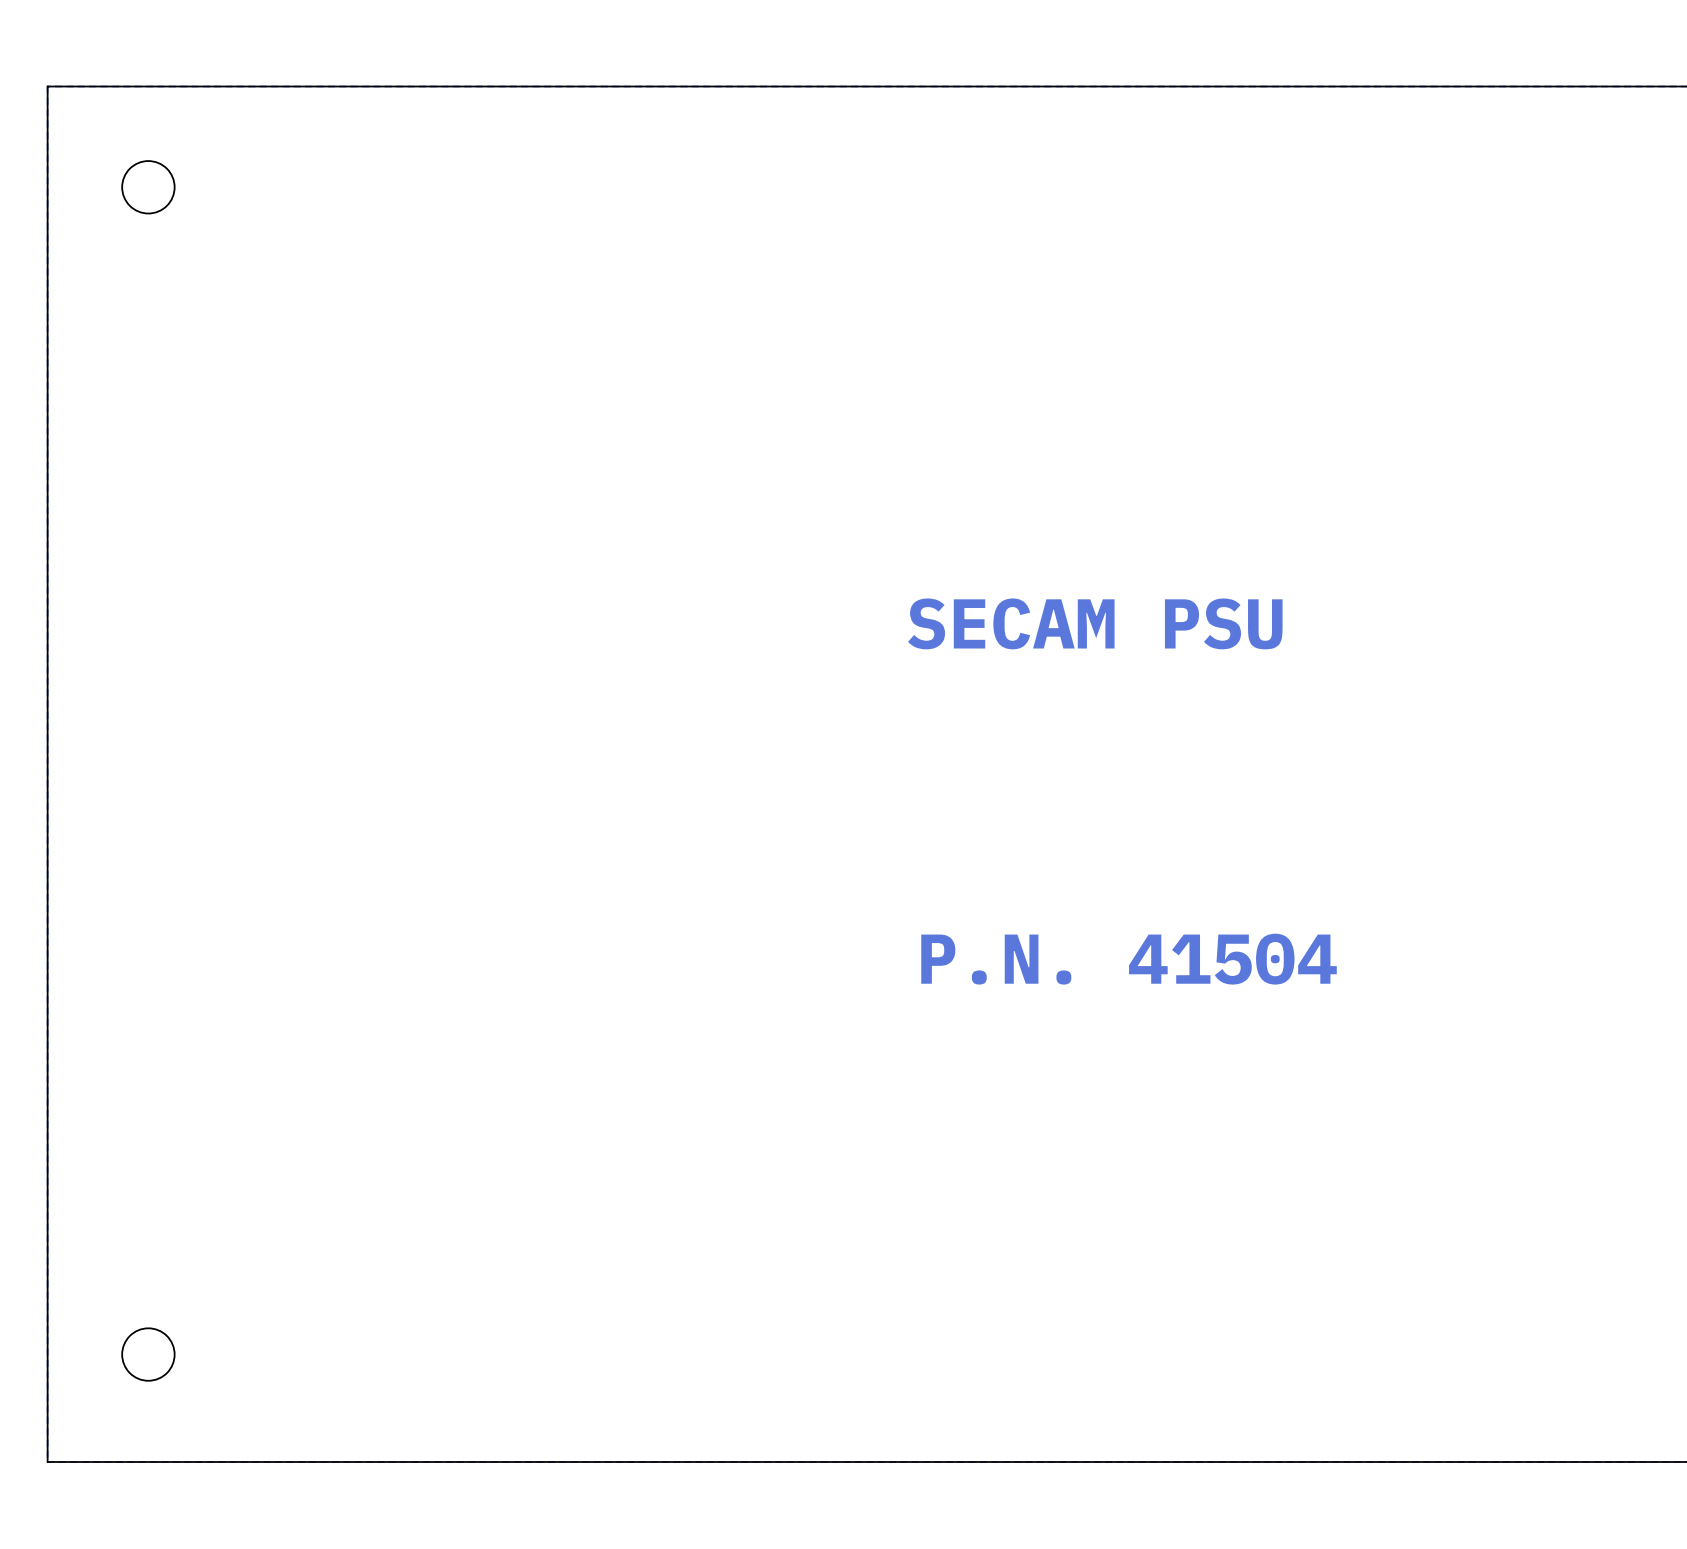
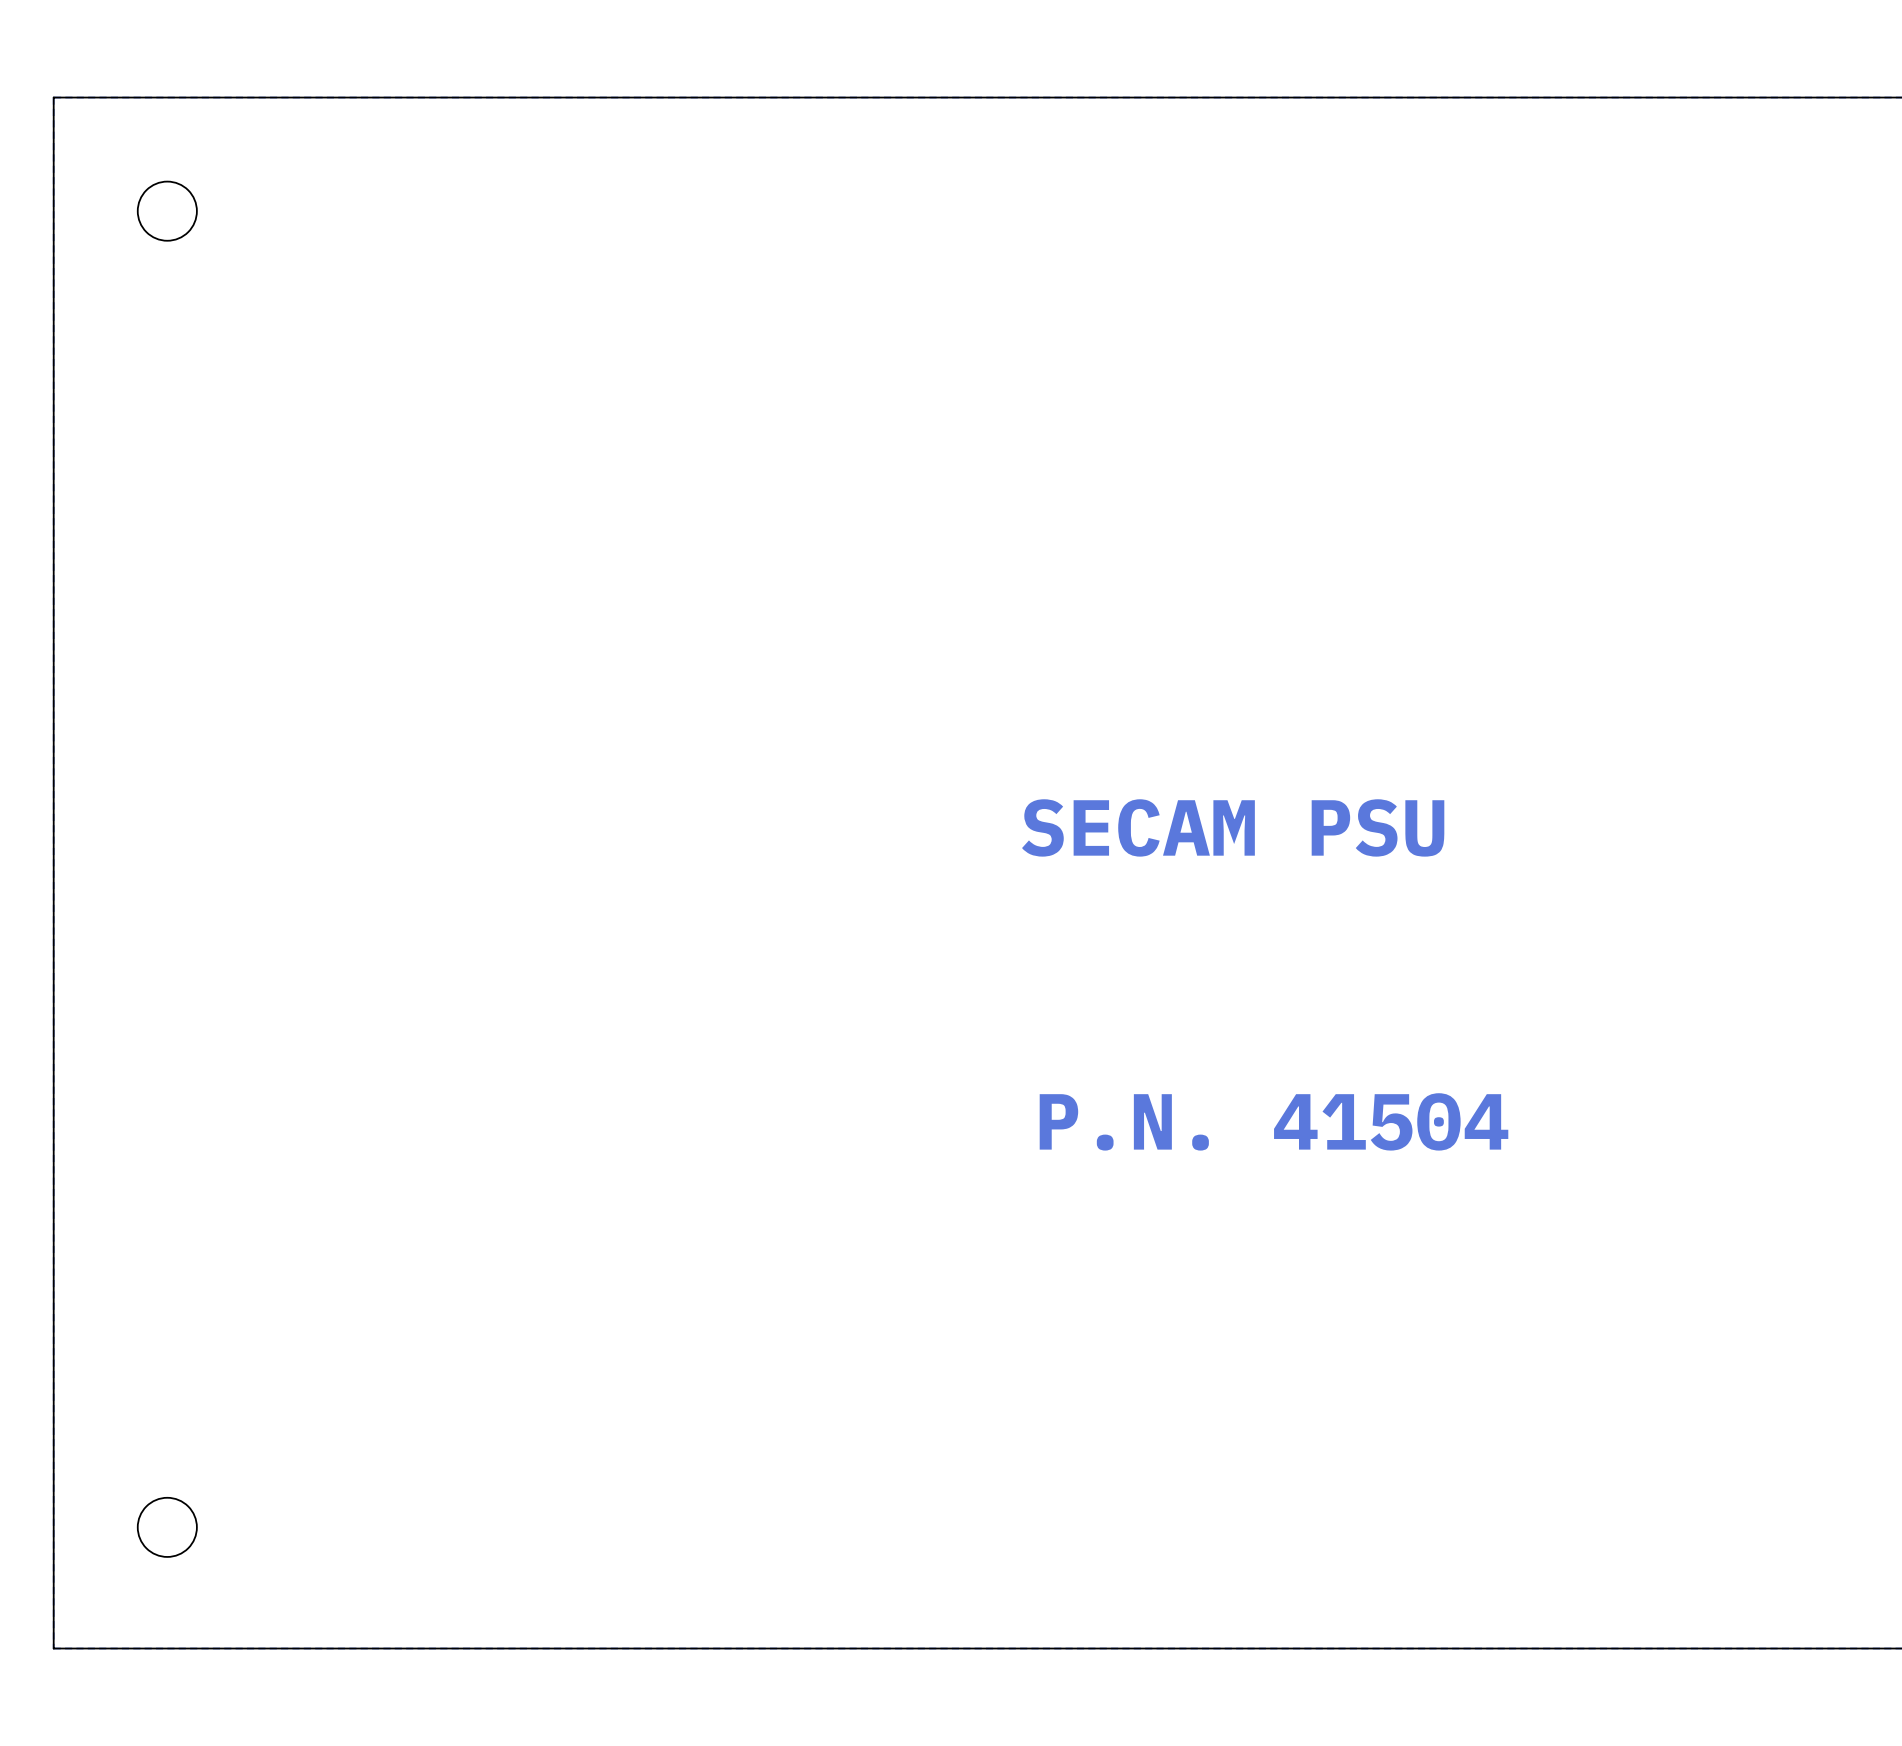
text position: SECAM PSU (1095, 623) -> SECAM PSU (1233, 827)
text position: P.N. 41504 (1129, 959) -> P.N. 41504 (1274, 1121)

